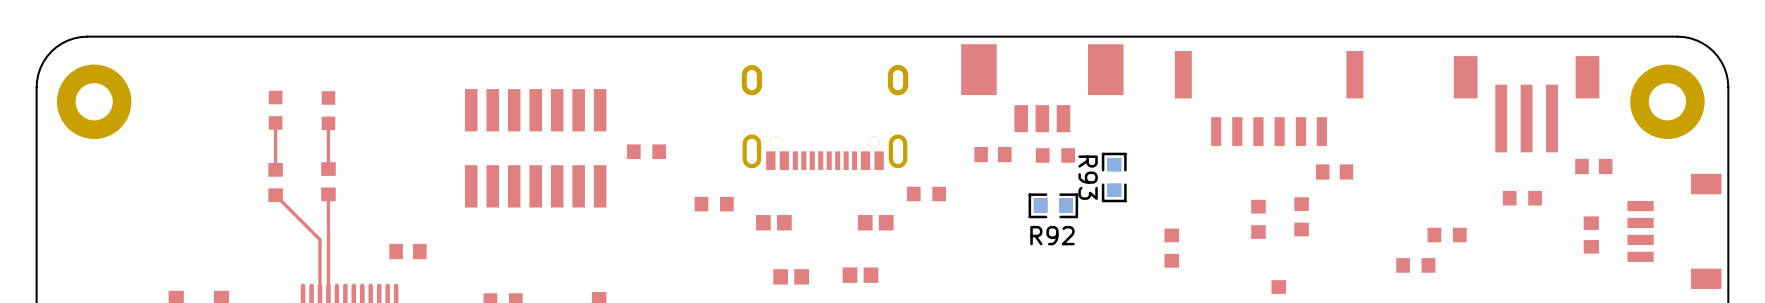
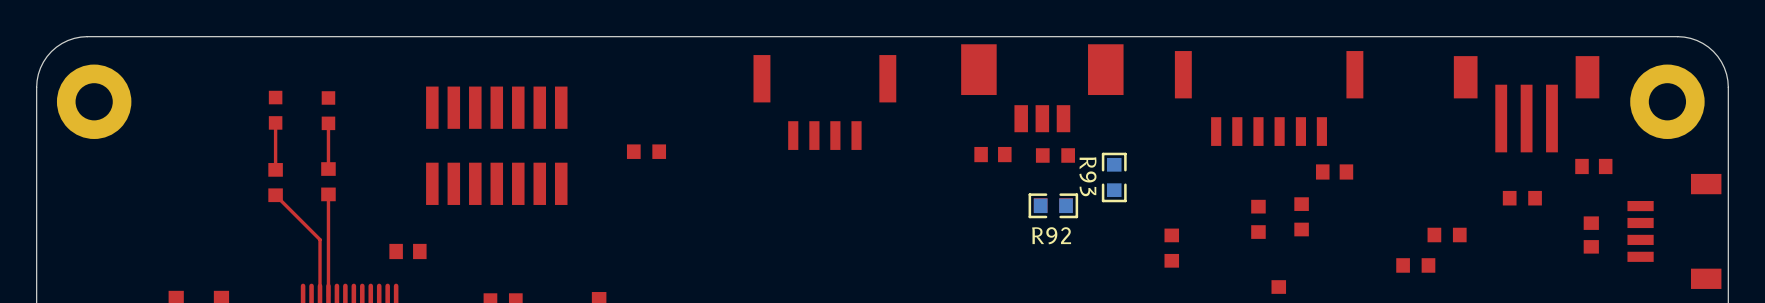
part footprint: [741, 64, 909, 170] -> [753, 55, 897, 150]
part position: (535, 148) -> (496, 145)
part: (926, 193) -> none
part: (714, 204) -> none
part: (773, 222) -> none
part: (875, 222) -> none
part: (860, 275) -> none
part: (791, 276) -> none

